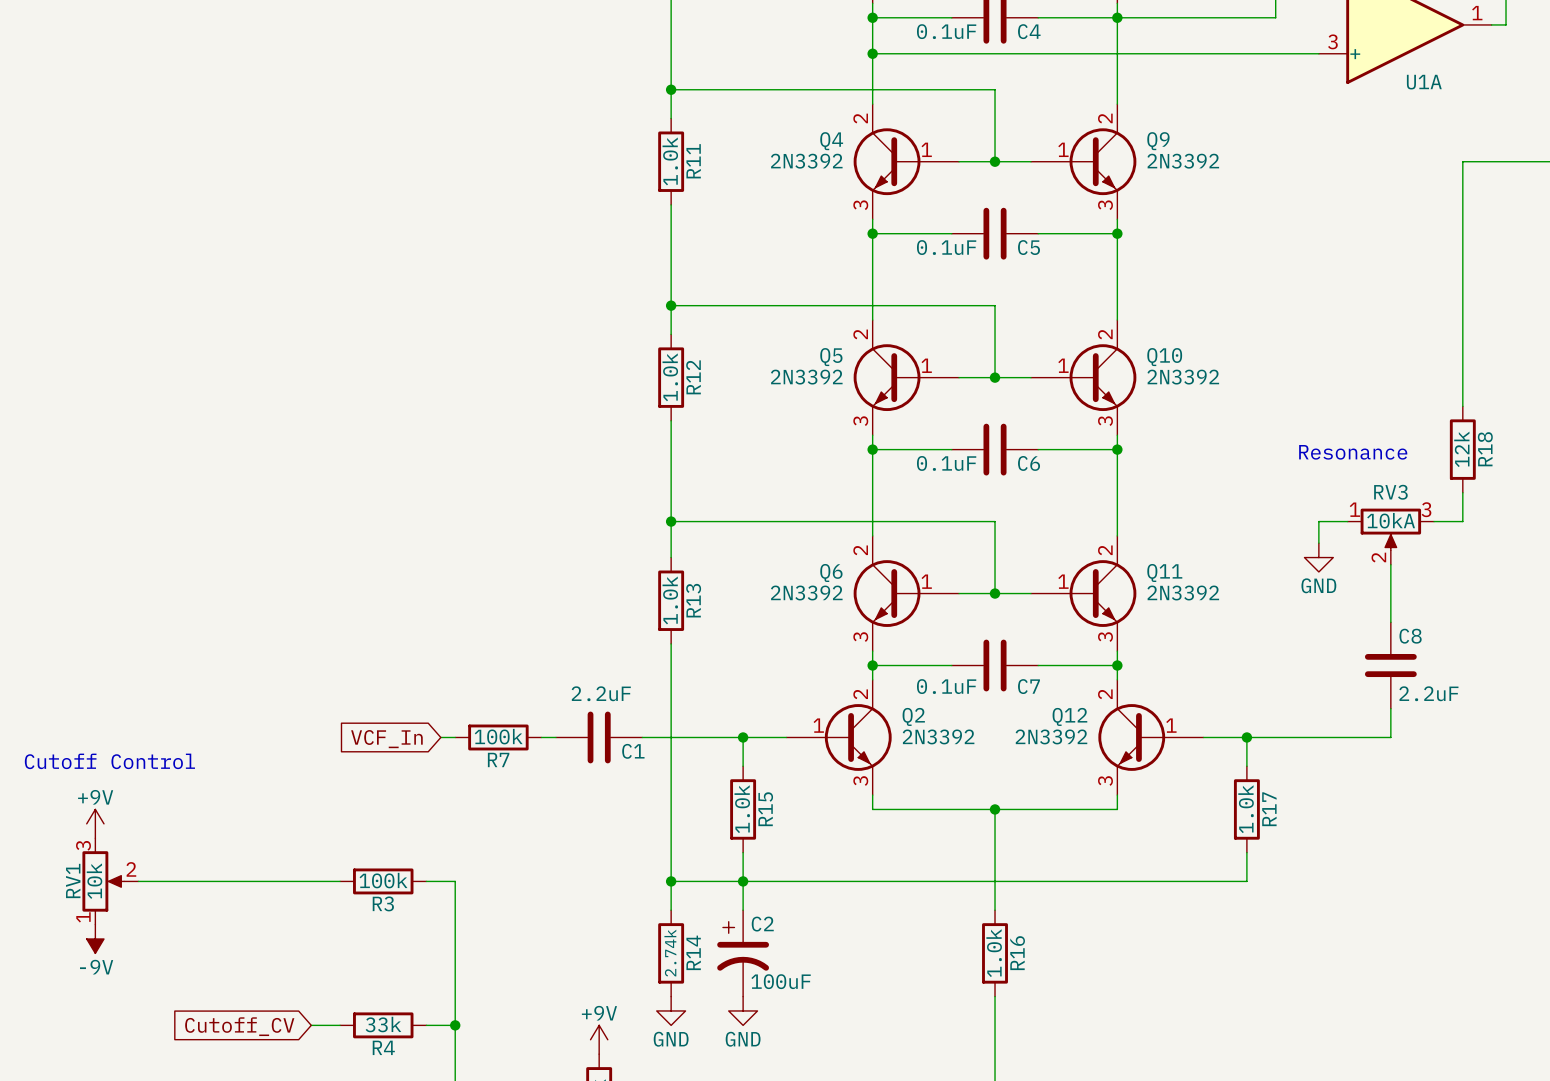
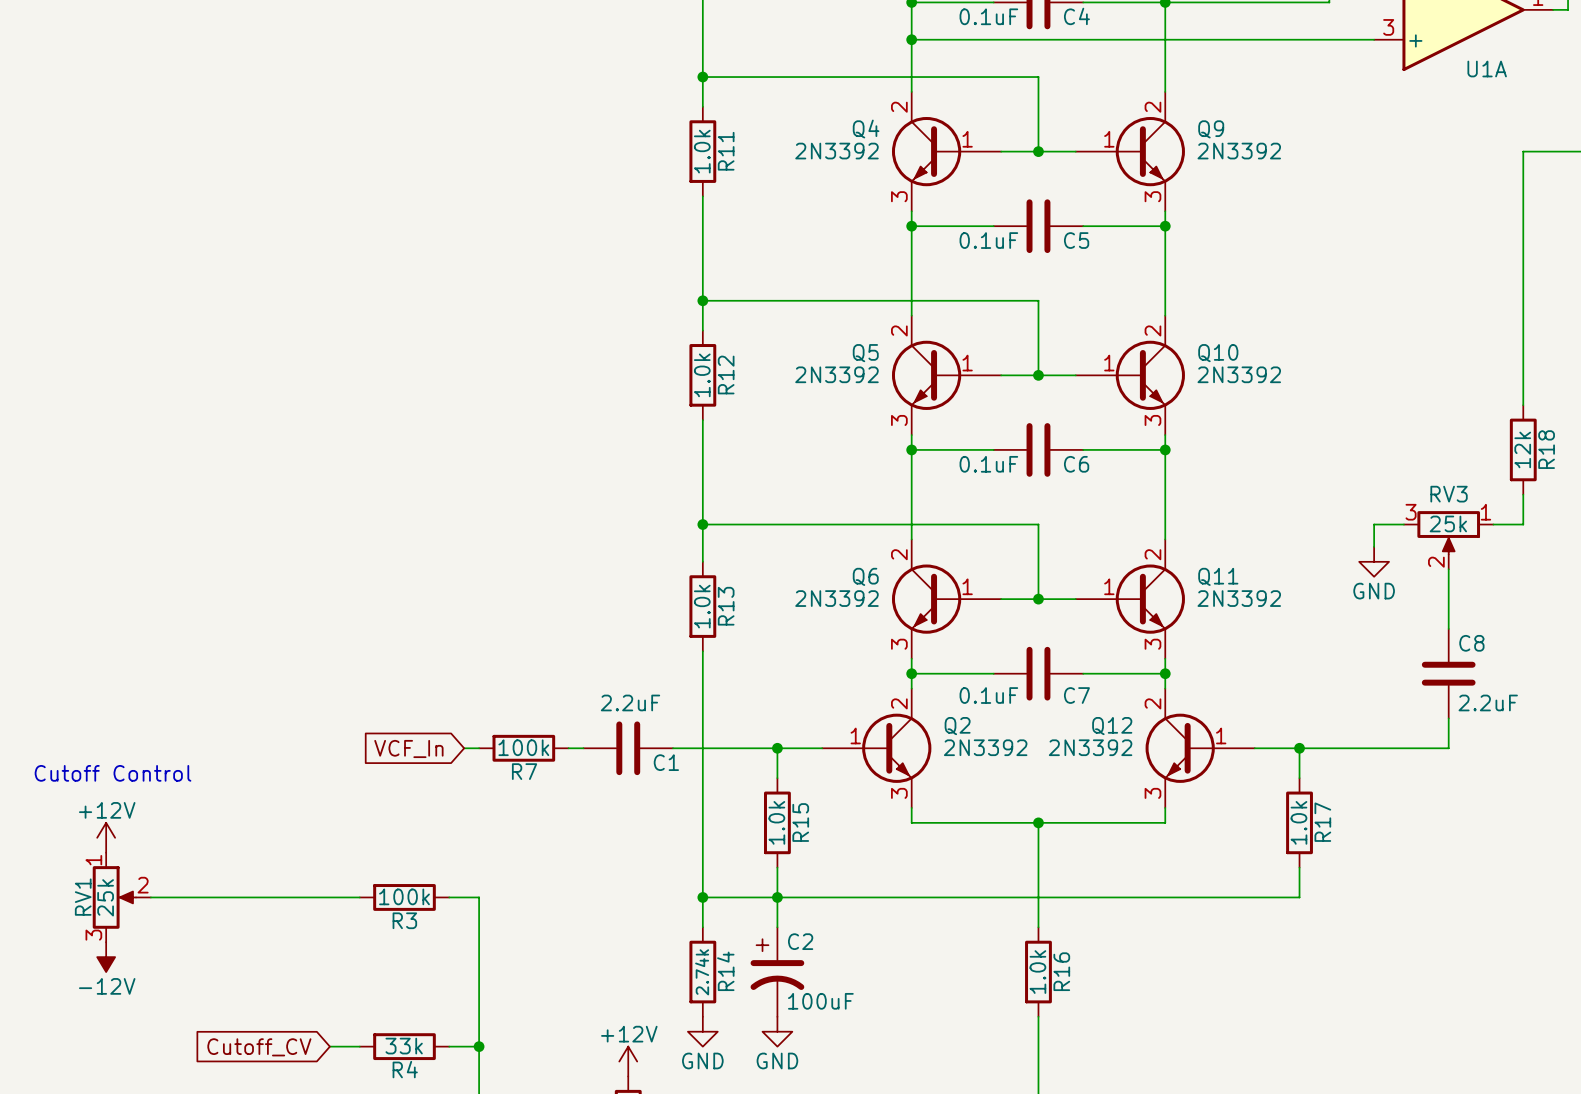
text: Resonance (1353, 452) -> none
RV3 value: 10kA (1391, 520) -> 25k (1448, 523)
RV3 flip: as is (1390, 529) -> left-right (1448, 532)
power symbol: +9V (95, 823) -> +12V (106, 837)
RV1 value: 10k (94, 881) -> 25k (105, 897)
RV1 flip: as is (103, 881) -> up-down (114, 897)
power symbol: -9V (95, 939) -> -12V (106, 957)
power symbol: +9V (599, 1039) -> +12V (628, 1061)

